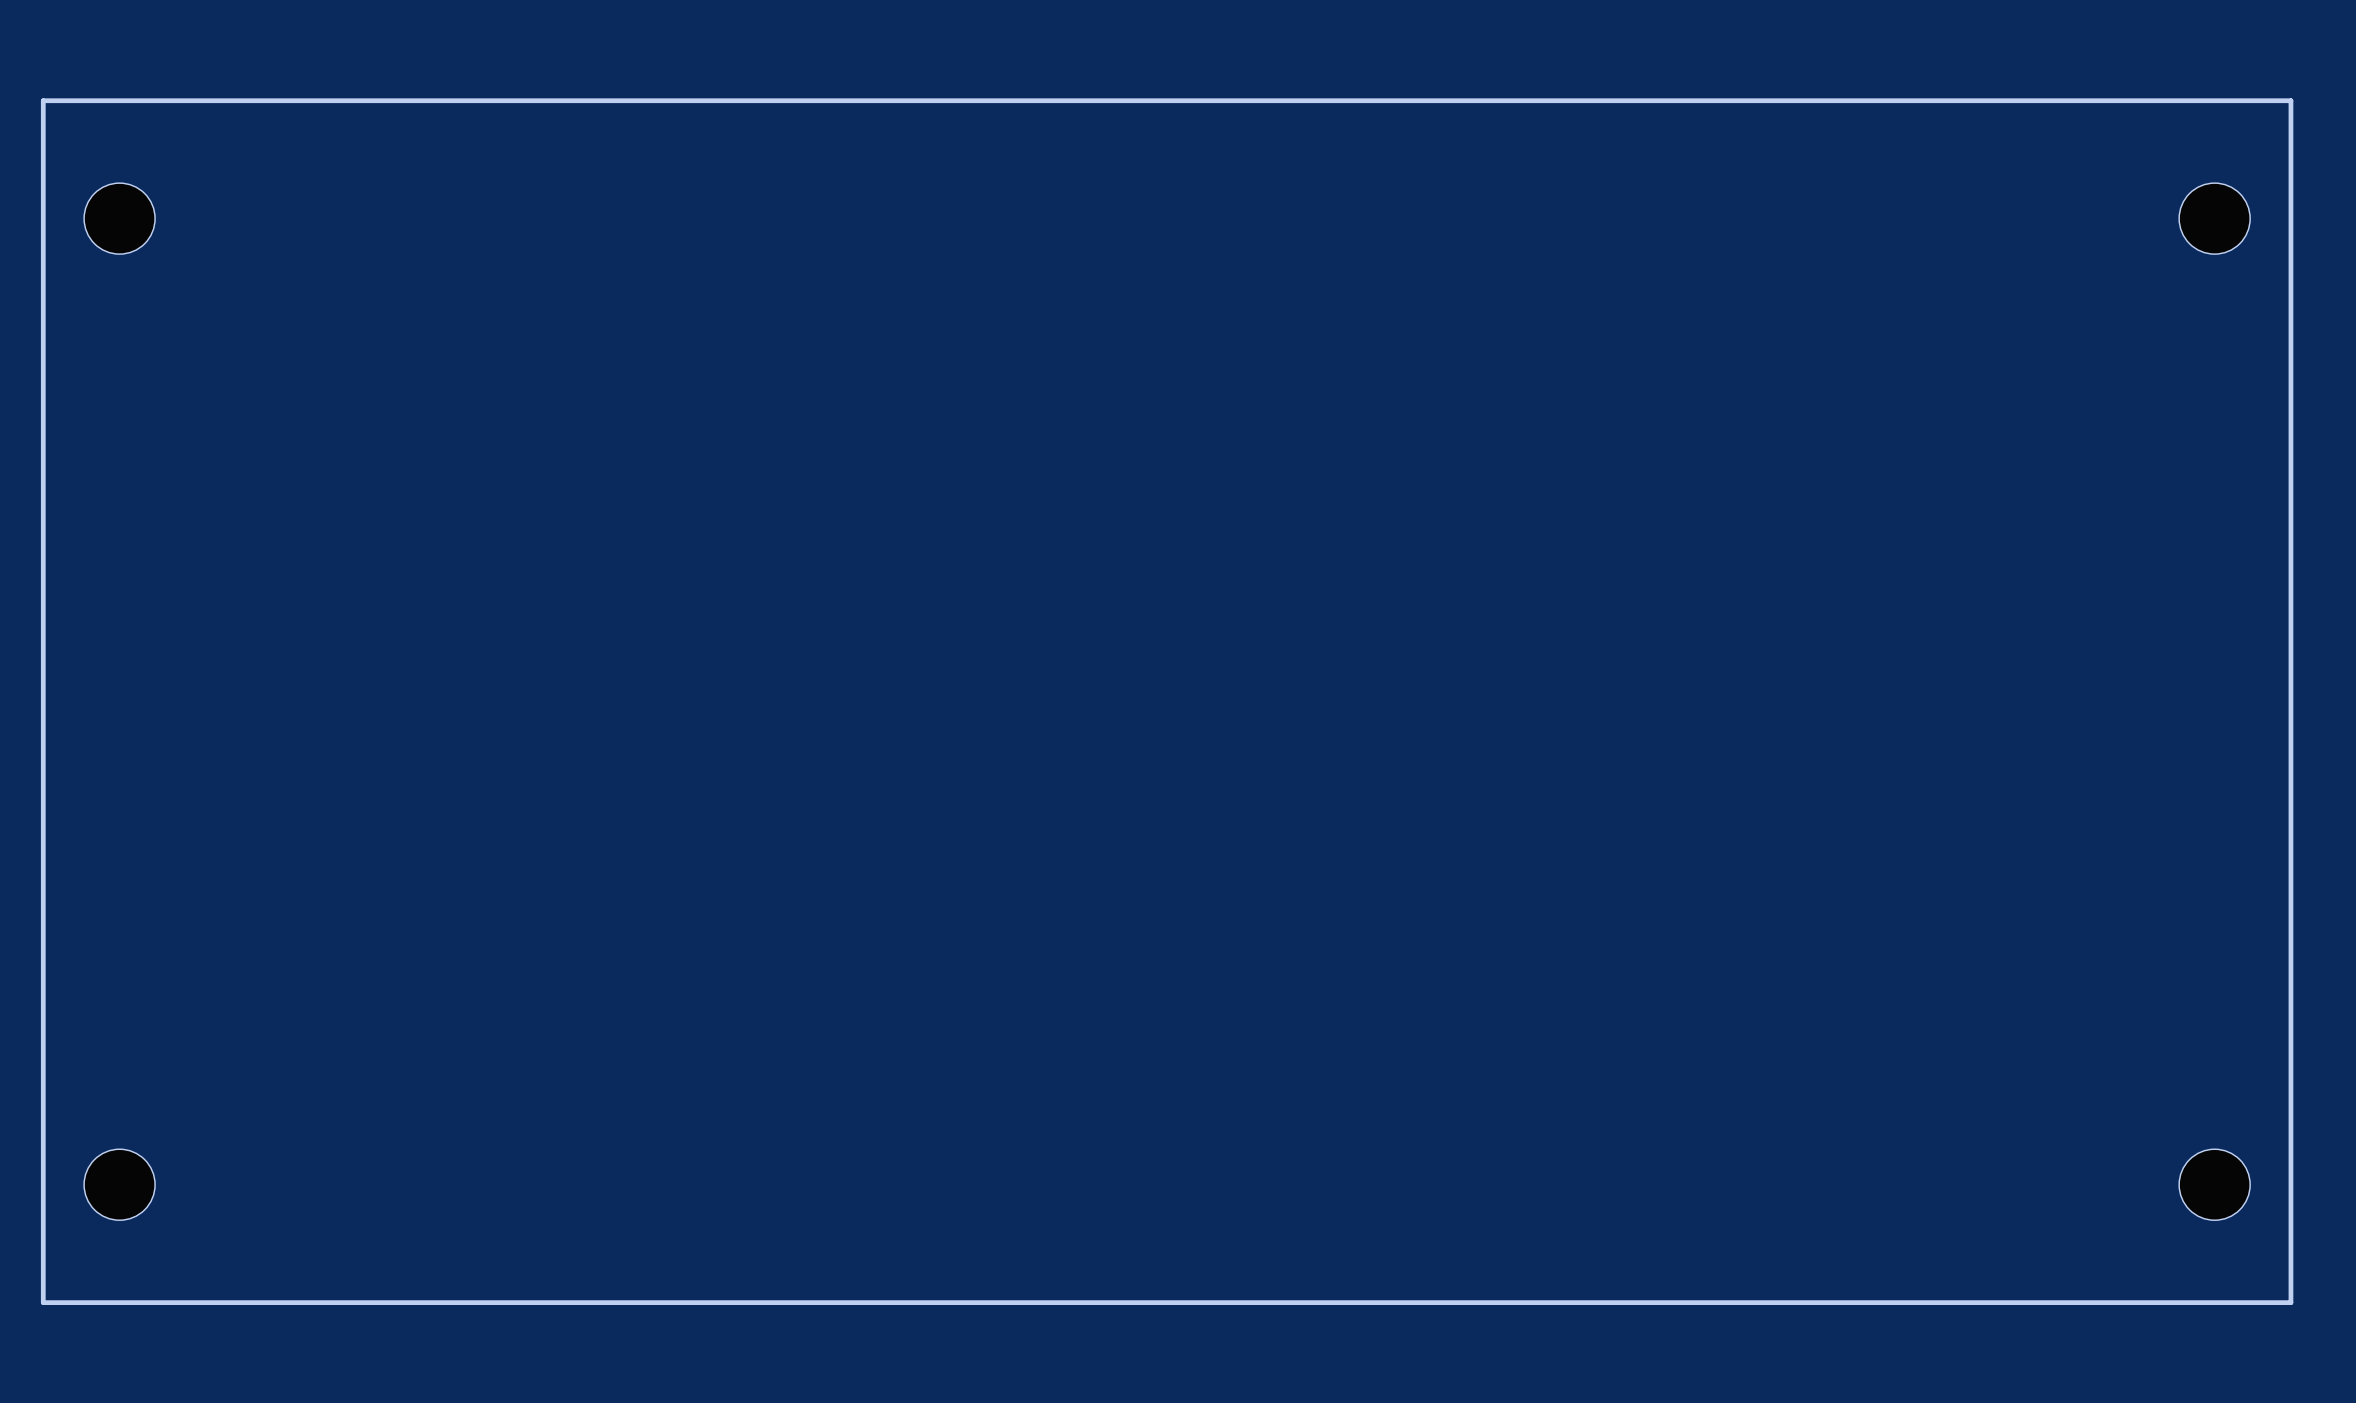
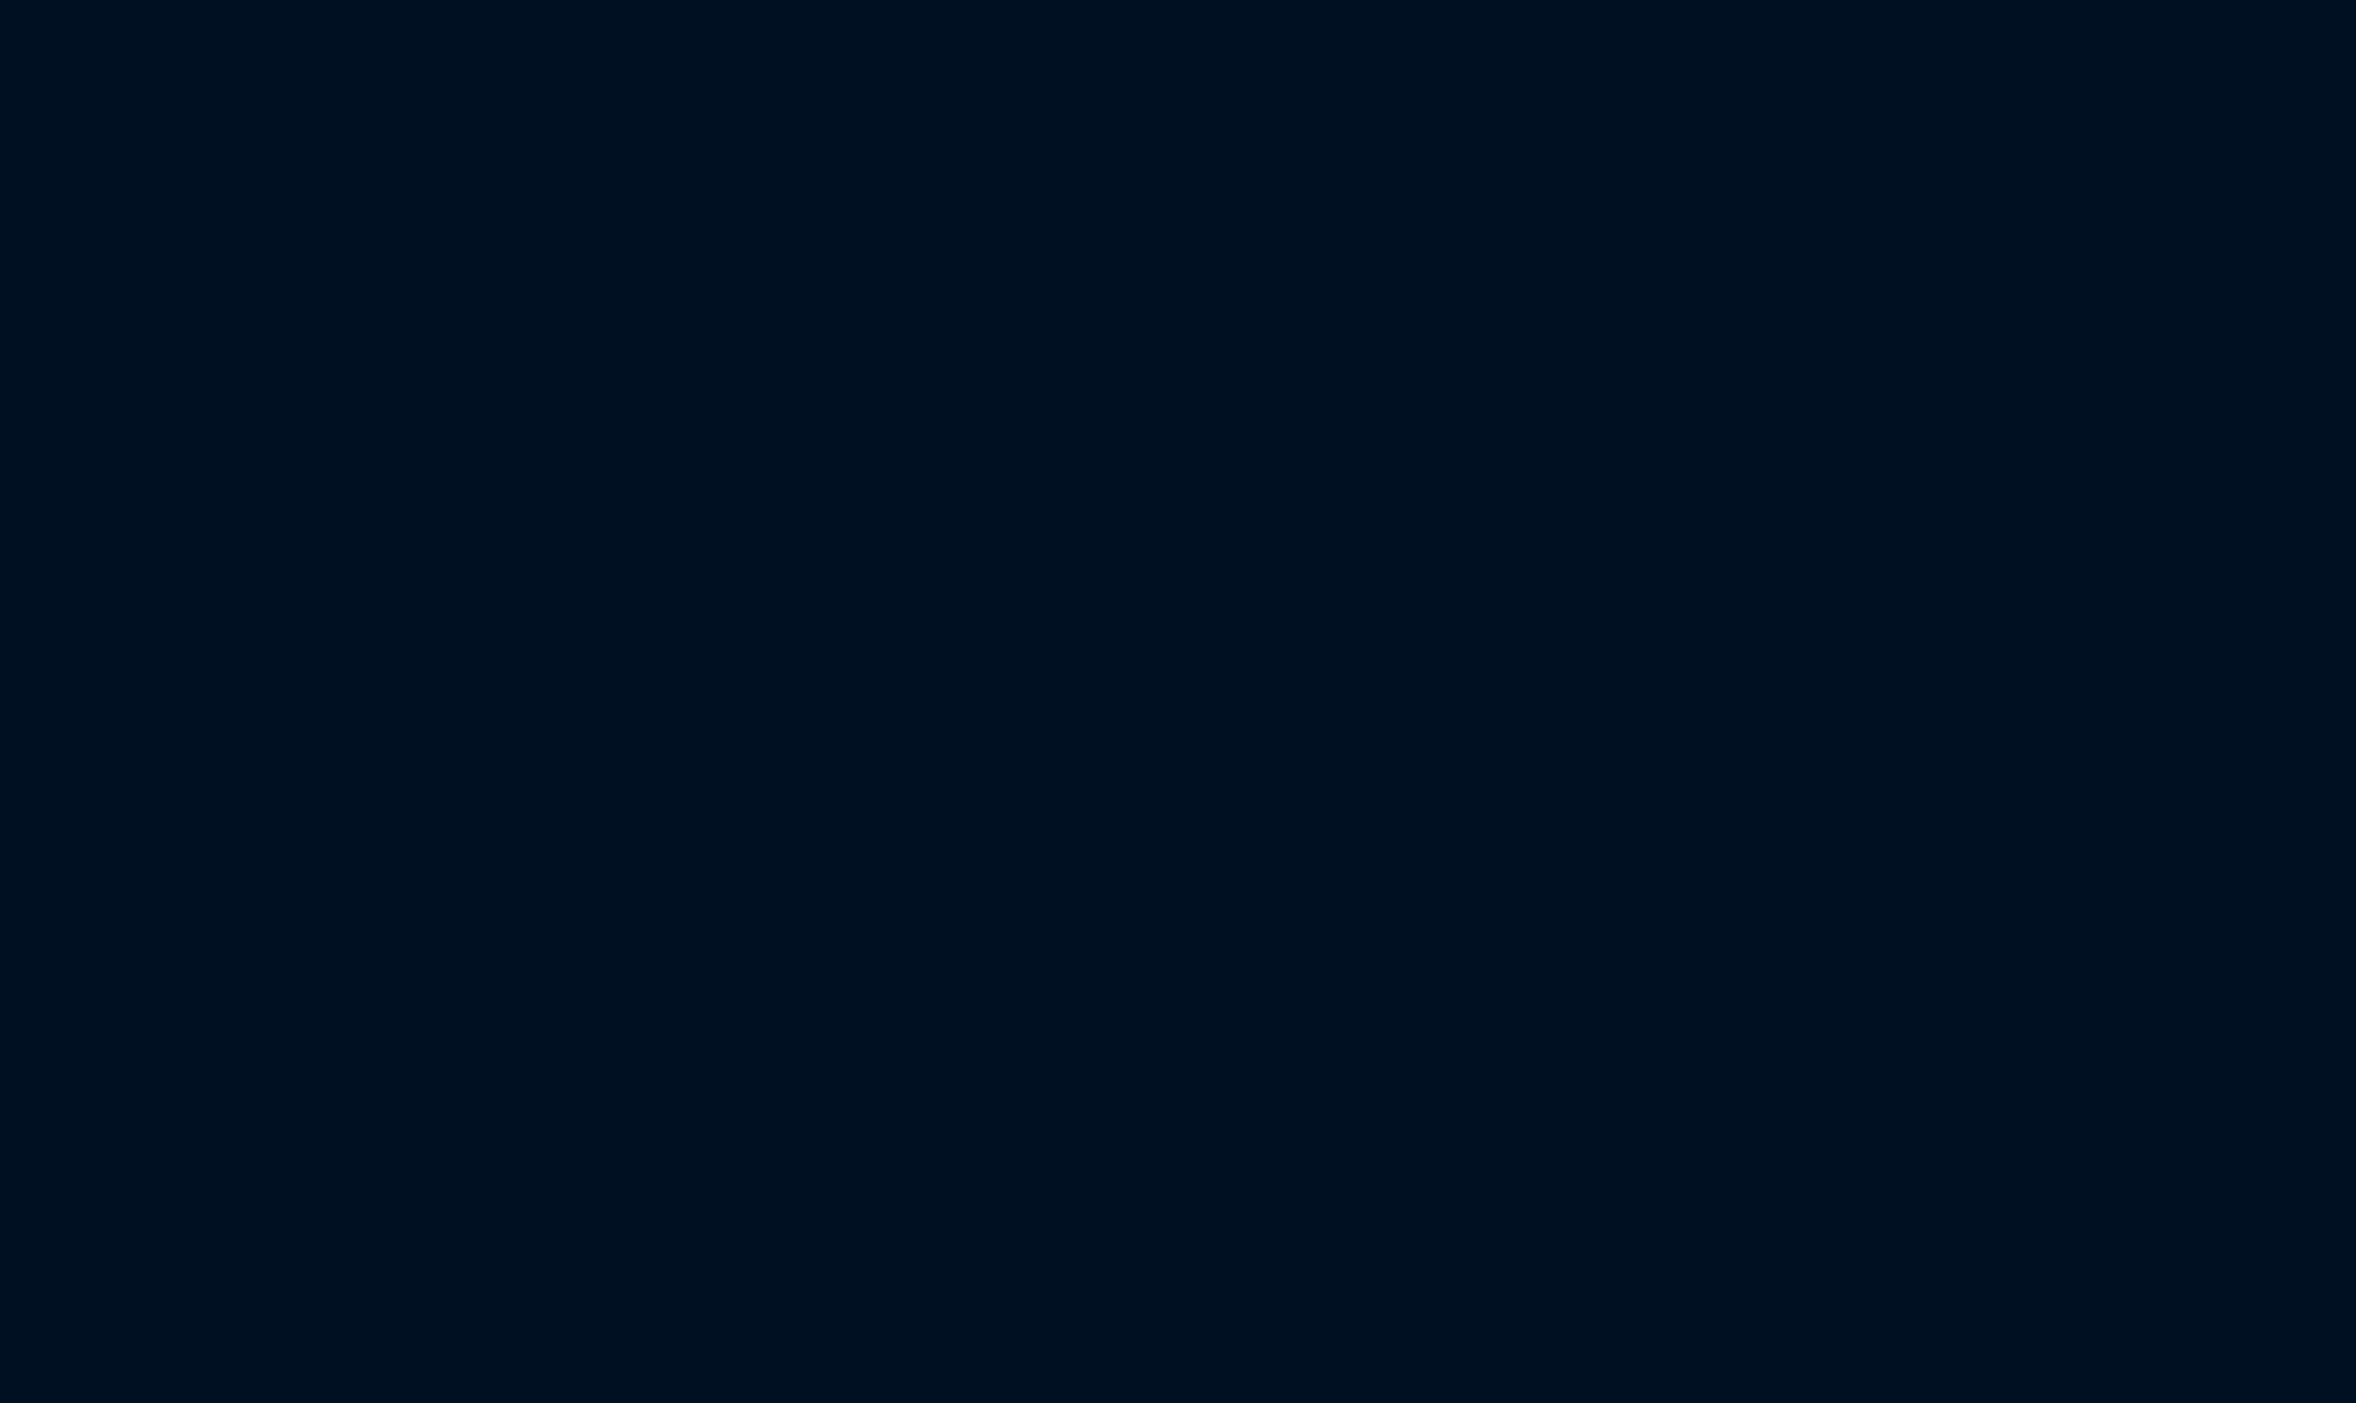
board edge: (2290, 100) (43, 100) (43, 1302) (2290, 1302) (2290, 100) -> none
part: (119, 218) -> none
part: (2214, 218) -> none
part: (119, 1184) -> none
part: (2214, 1184) -> none

